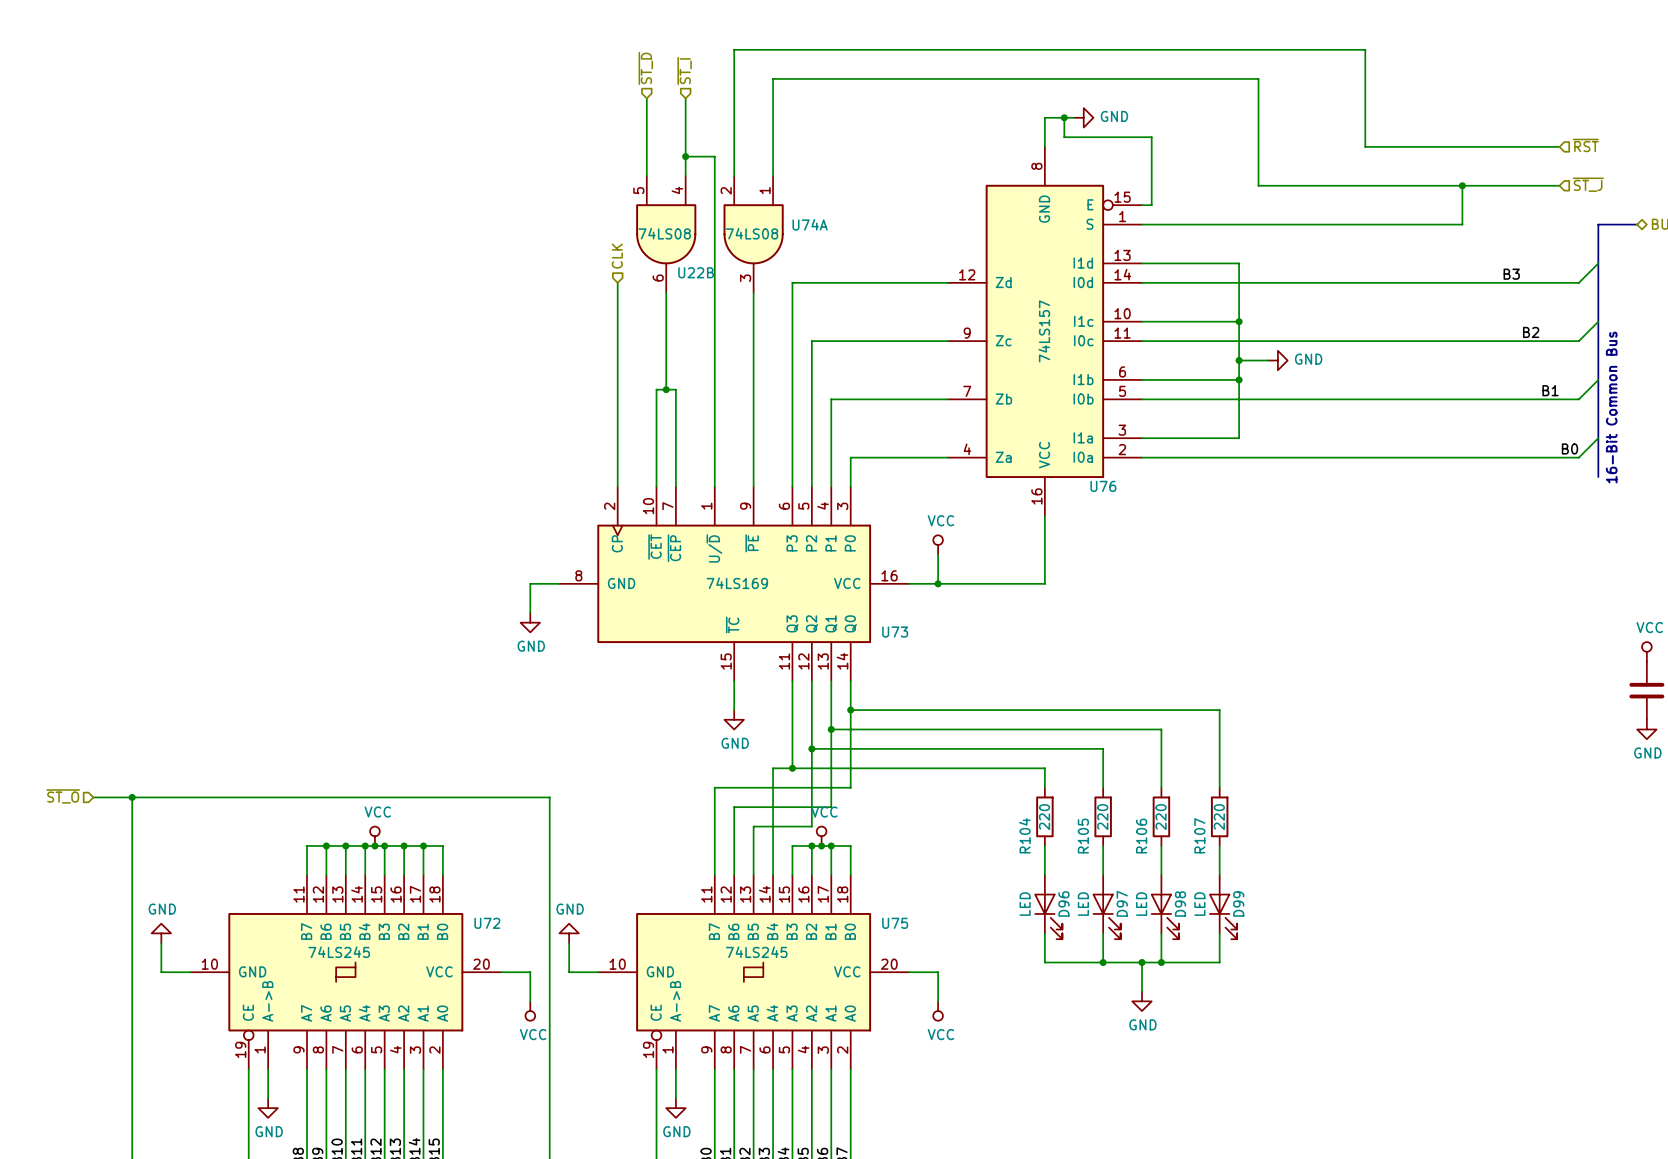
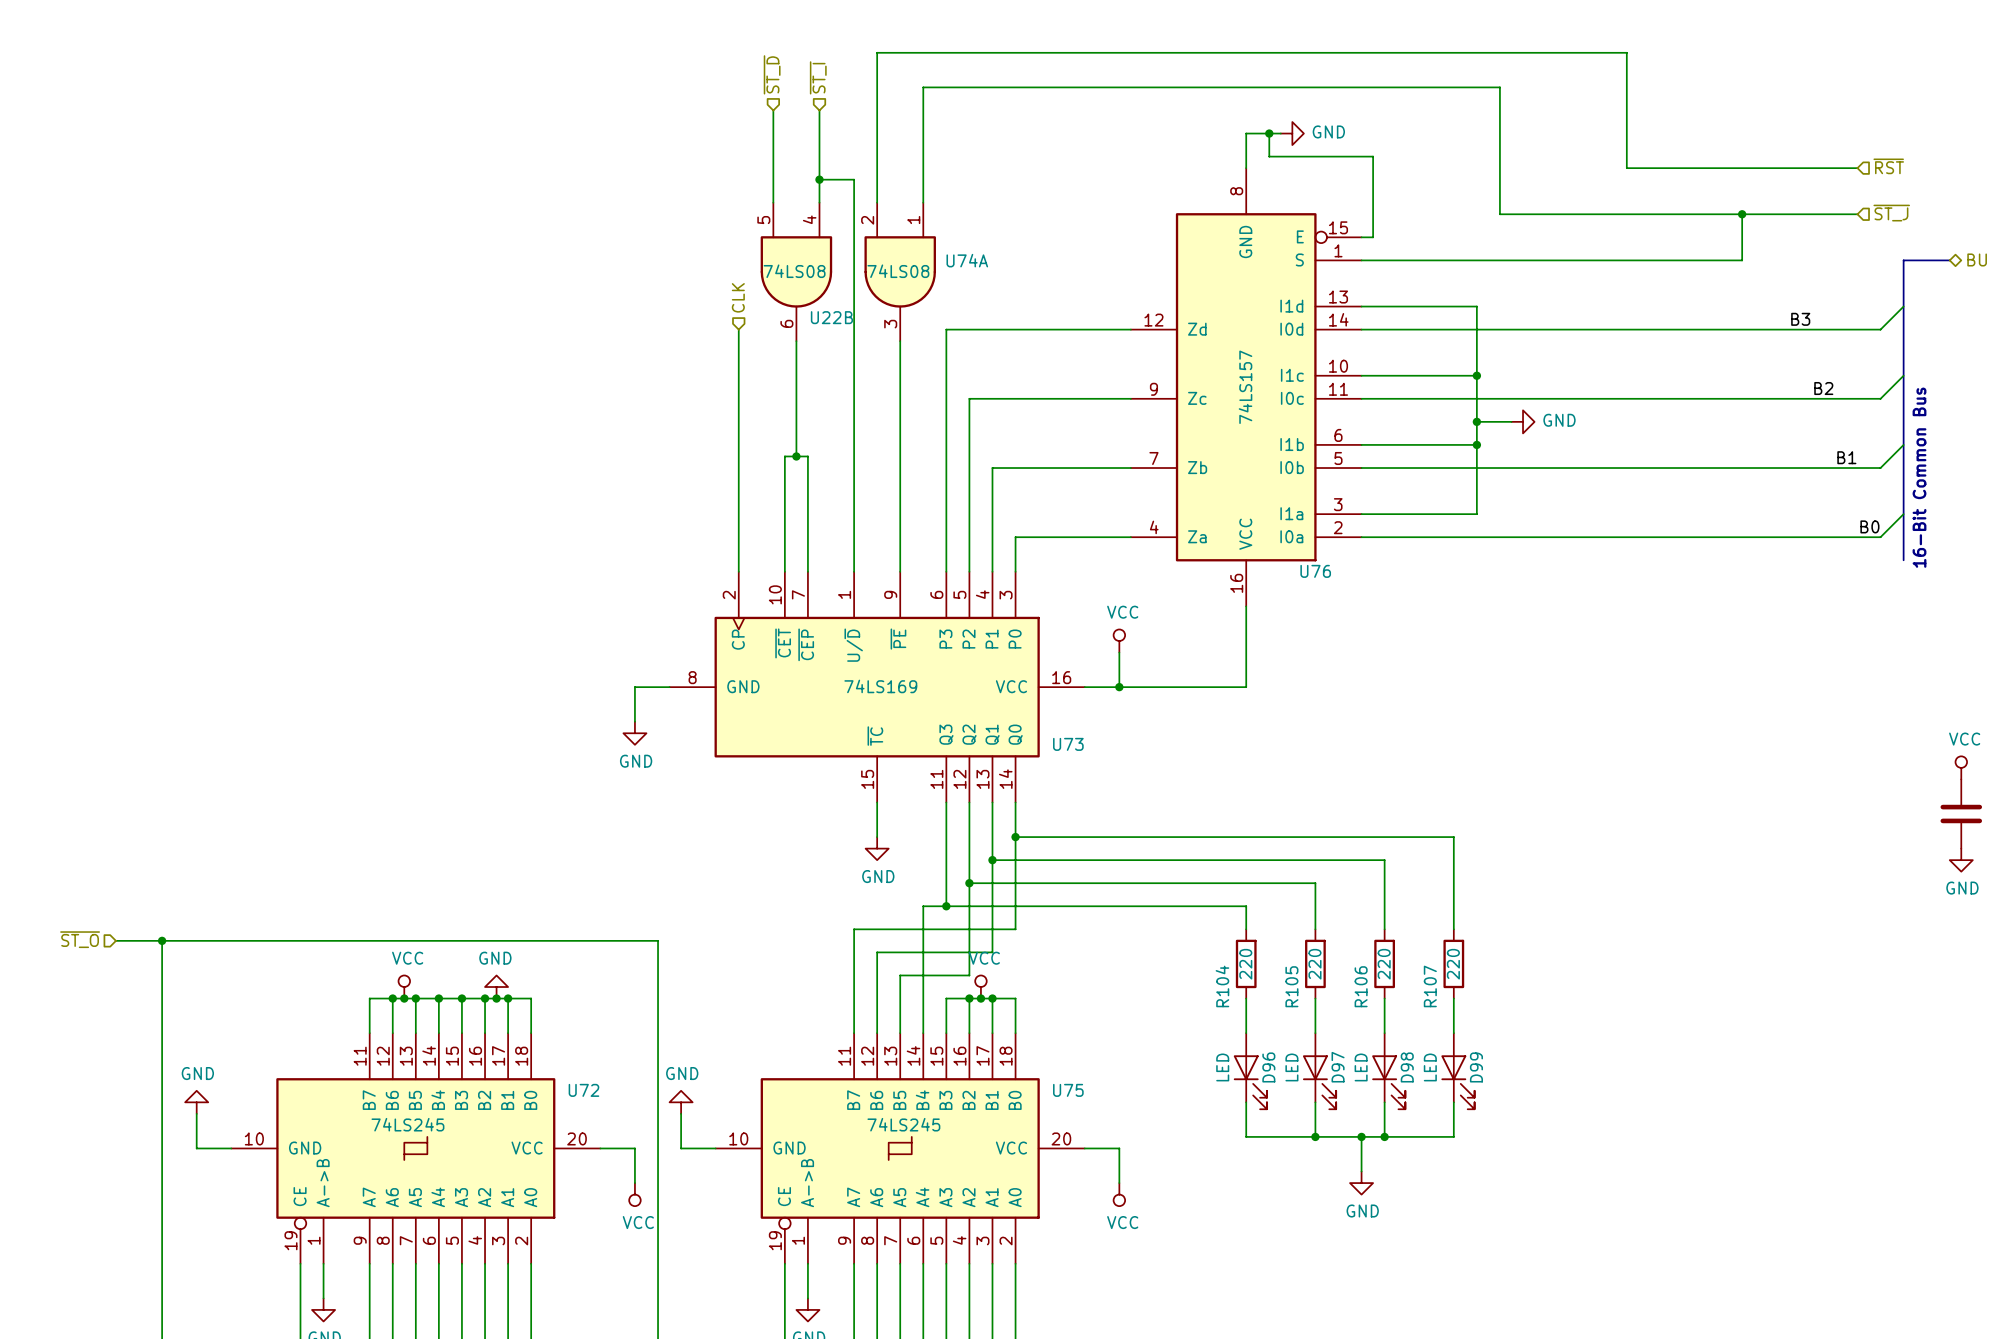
power symbol position: VCC (374, 836) -> VCC (404, 987)
power symbol: none -> GND (496, 987)
junction: none -> (404, 998)
junction: (374, 845) -> none
junction: none -> (496, 998)

